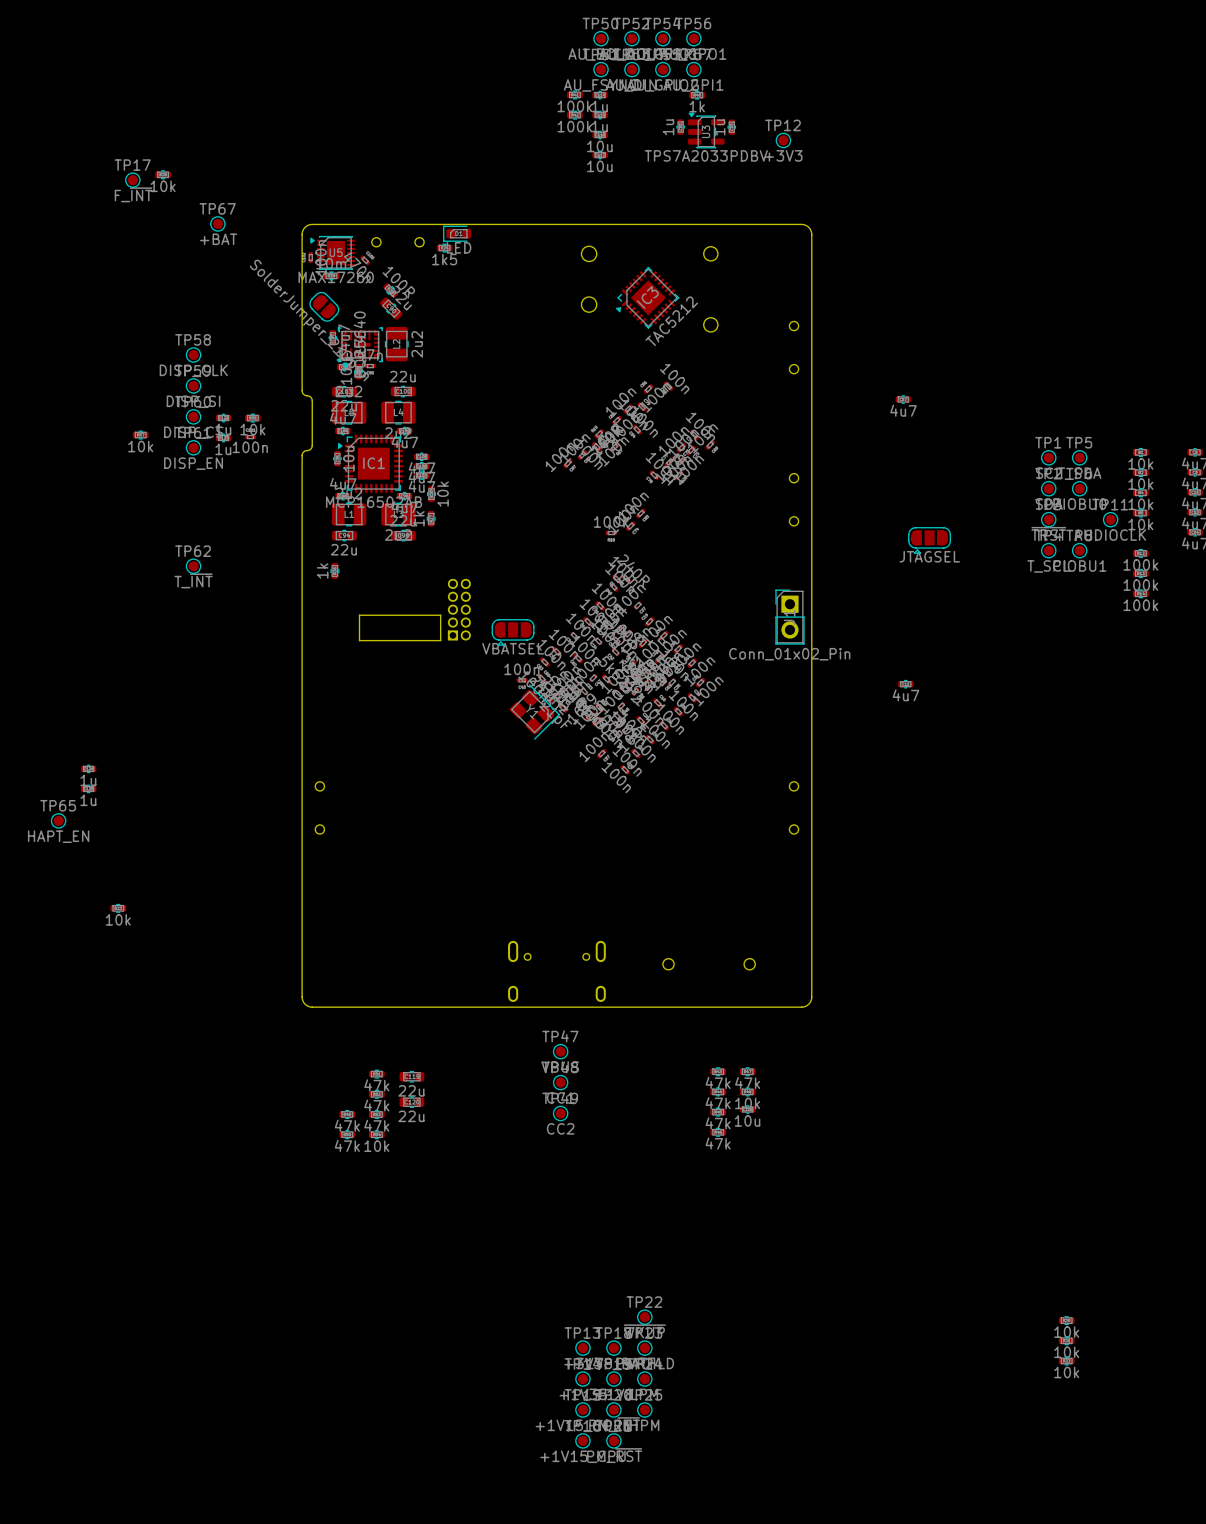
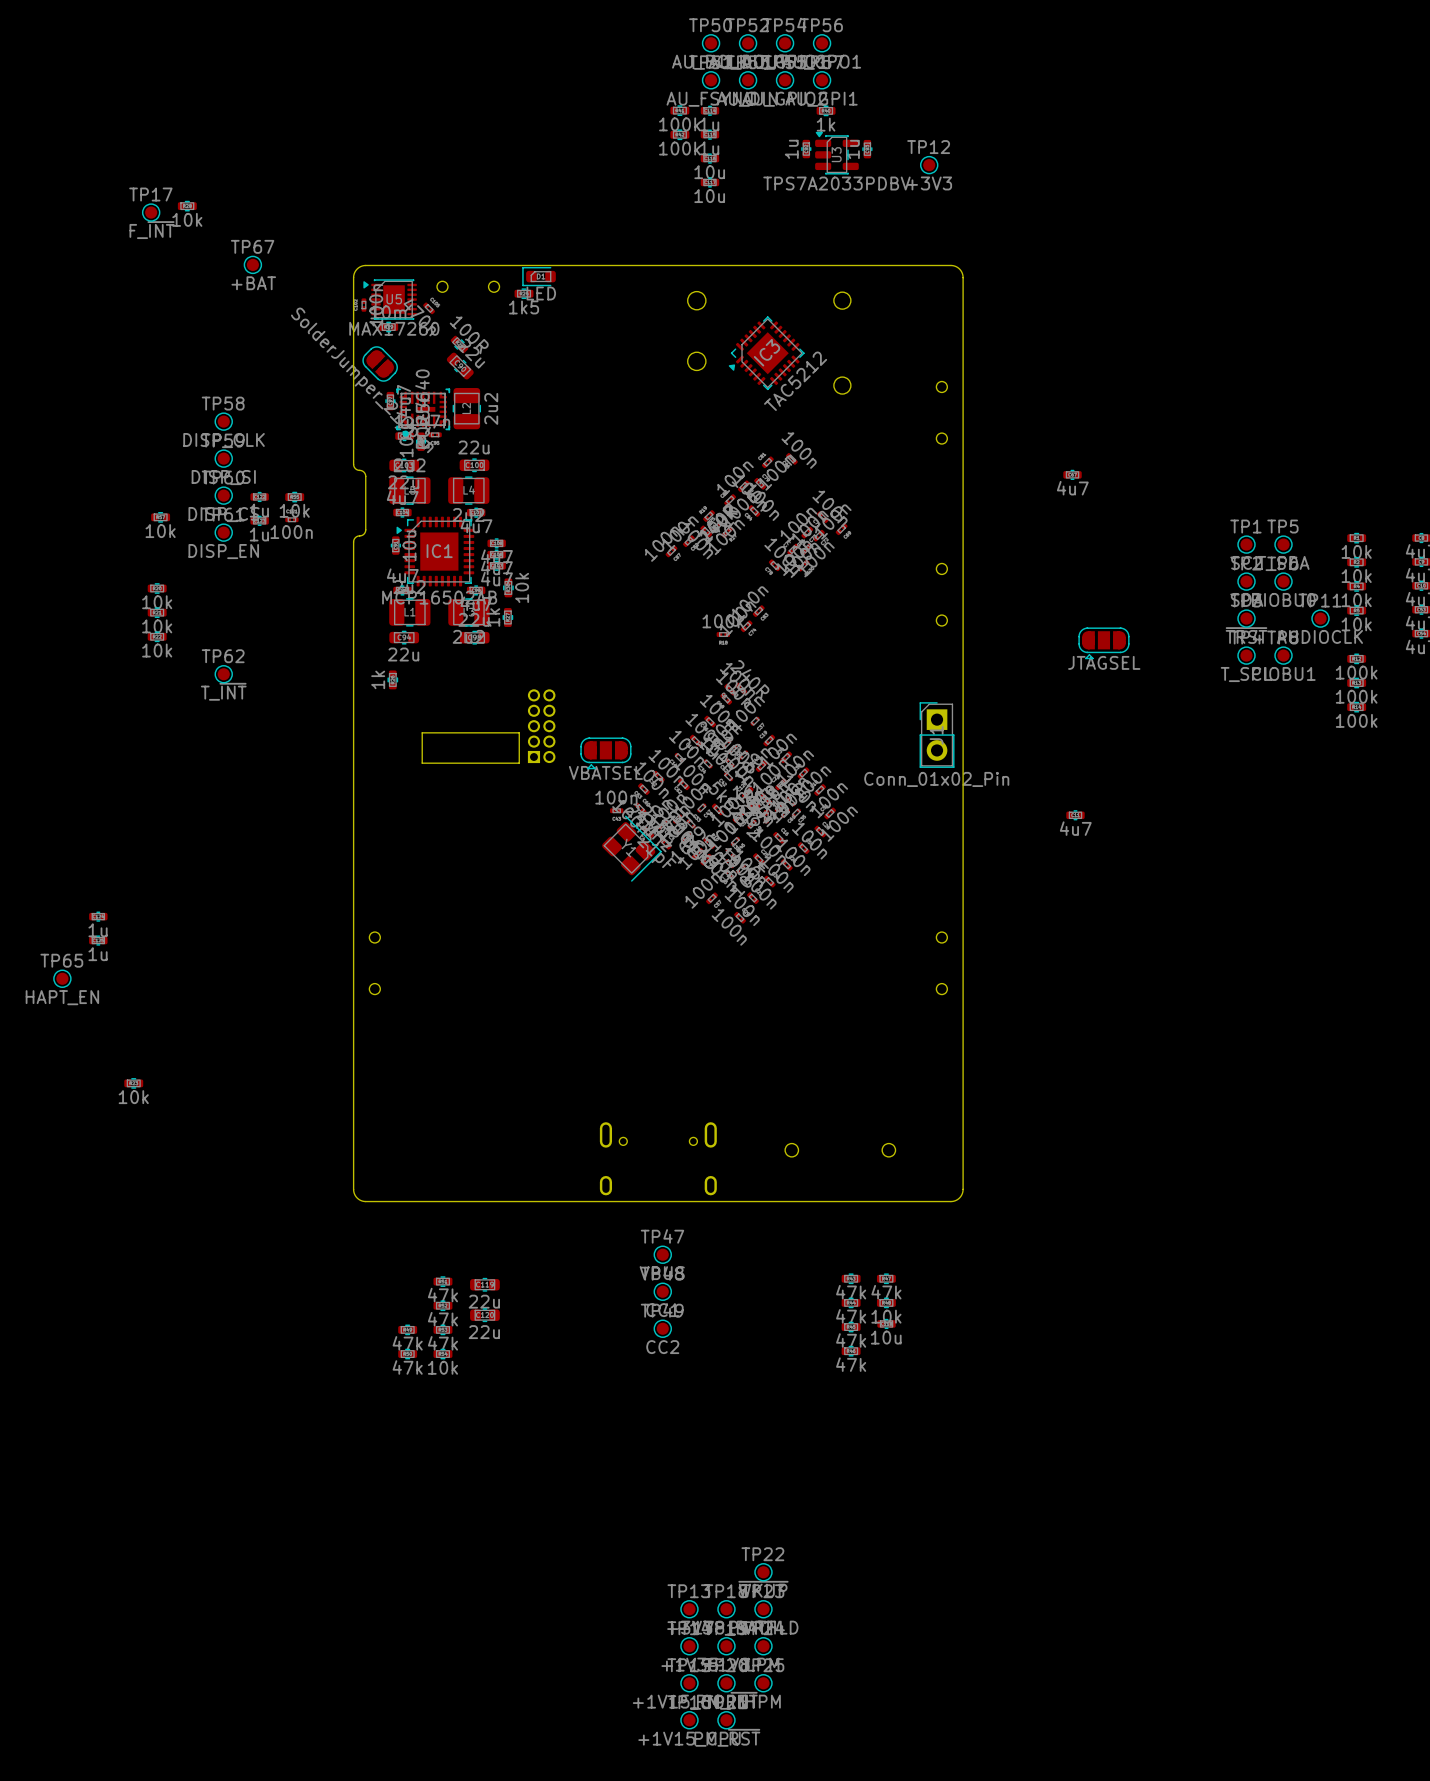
part position: (1066, 1320) -> (157, 588)
part position: (1066, 1340) -> (157, 612)
part position: (1066, 1360) -> (157, 636)

